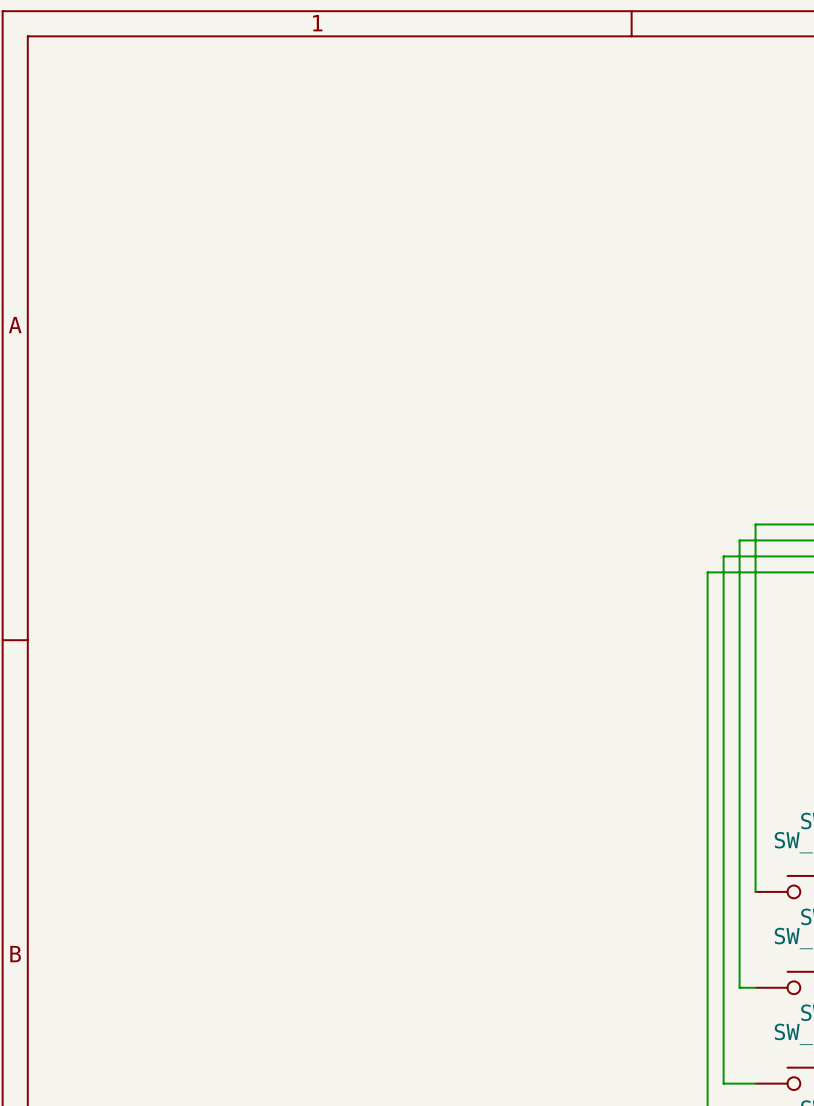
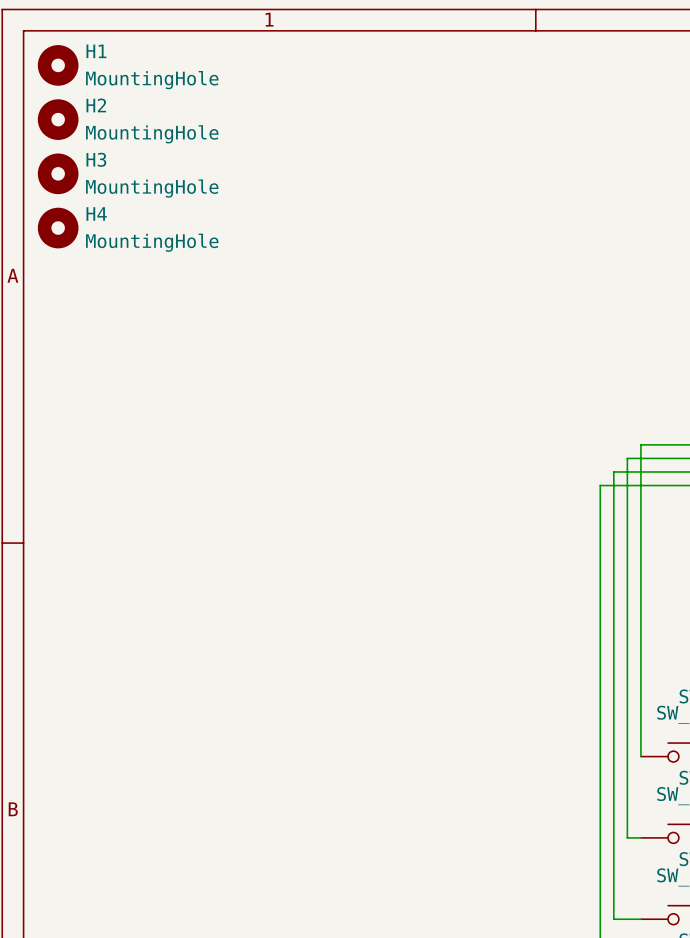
H1: none -> MountingHole (58, 65)
H2: none -> MountingHole (58, 119)
H3: none -> MountingHole (58, 173)
H4: none -> MountingHole (58, 228)

